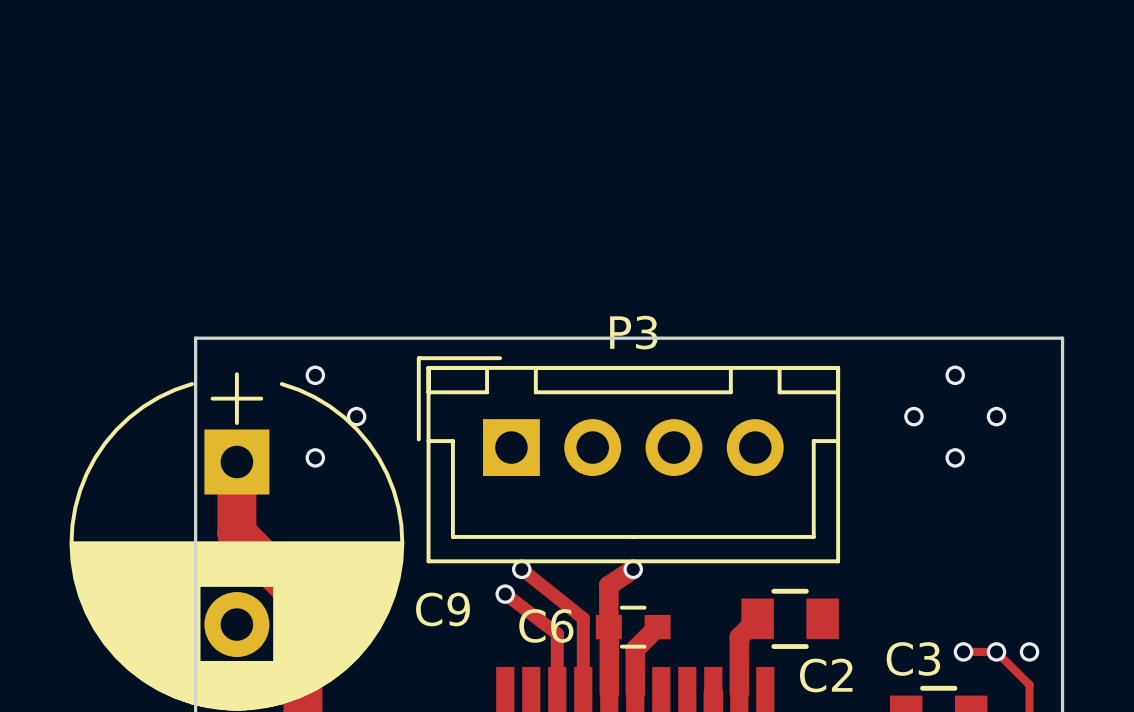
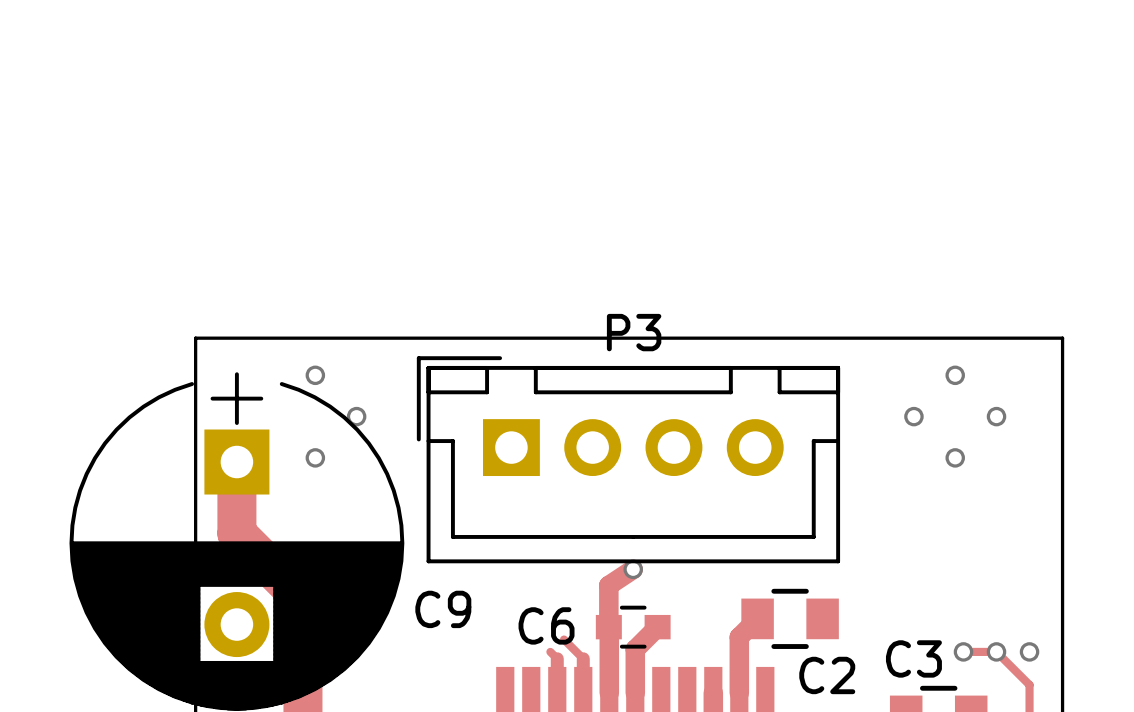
track: (521, 569) (583, 618) (583, 658) -> (564, 639) (583, 658)
via: (521, 569) -> none
track: (505, 594) (557, 633) (557, 658) -> (550, 651) (557, 658)
via: (505, 594) -> none

